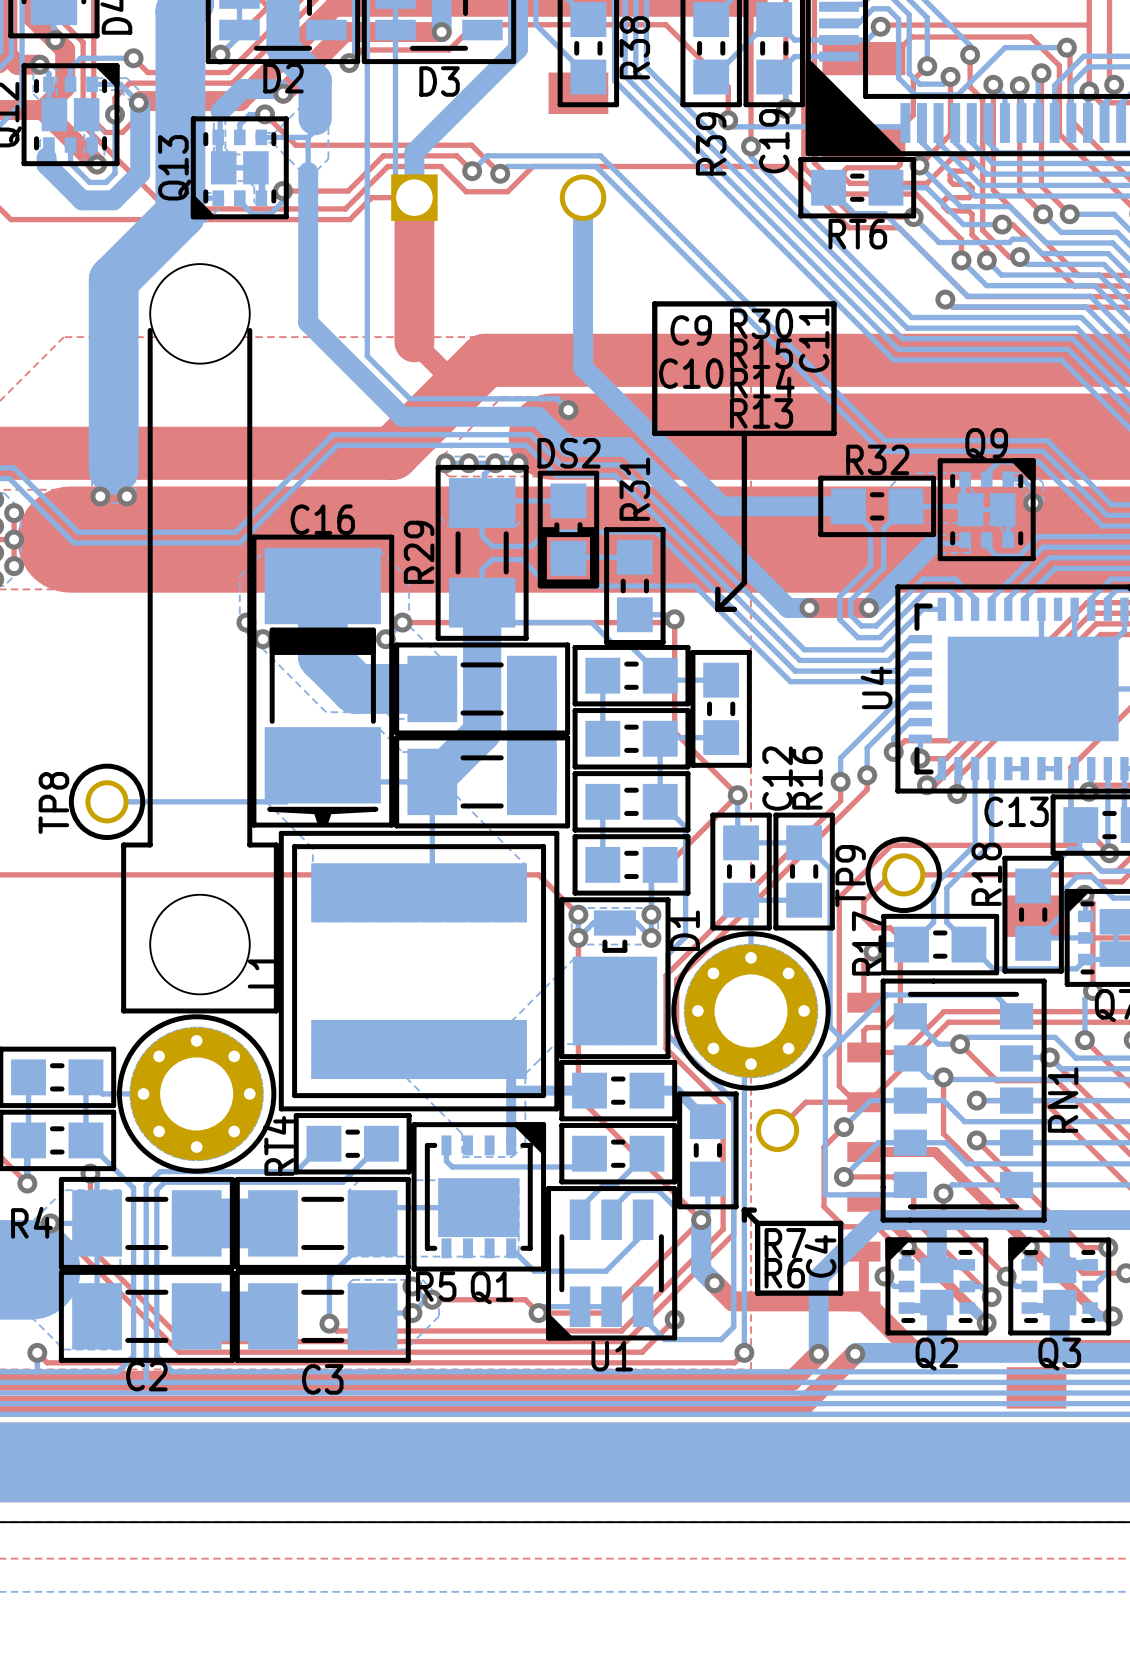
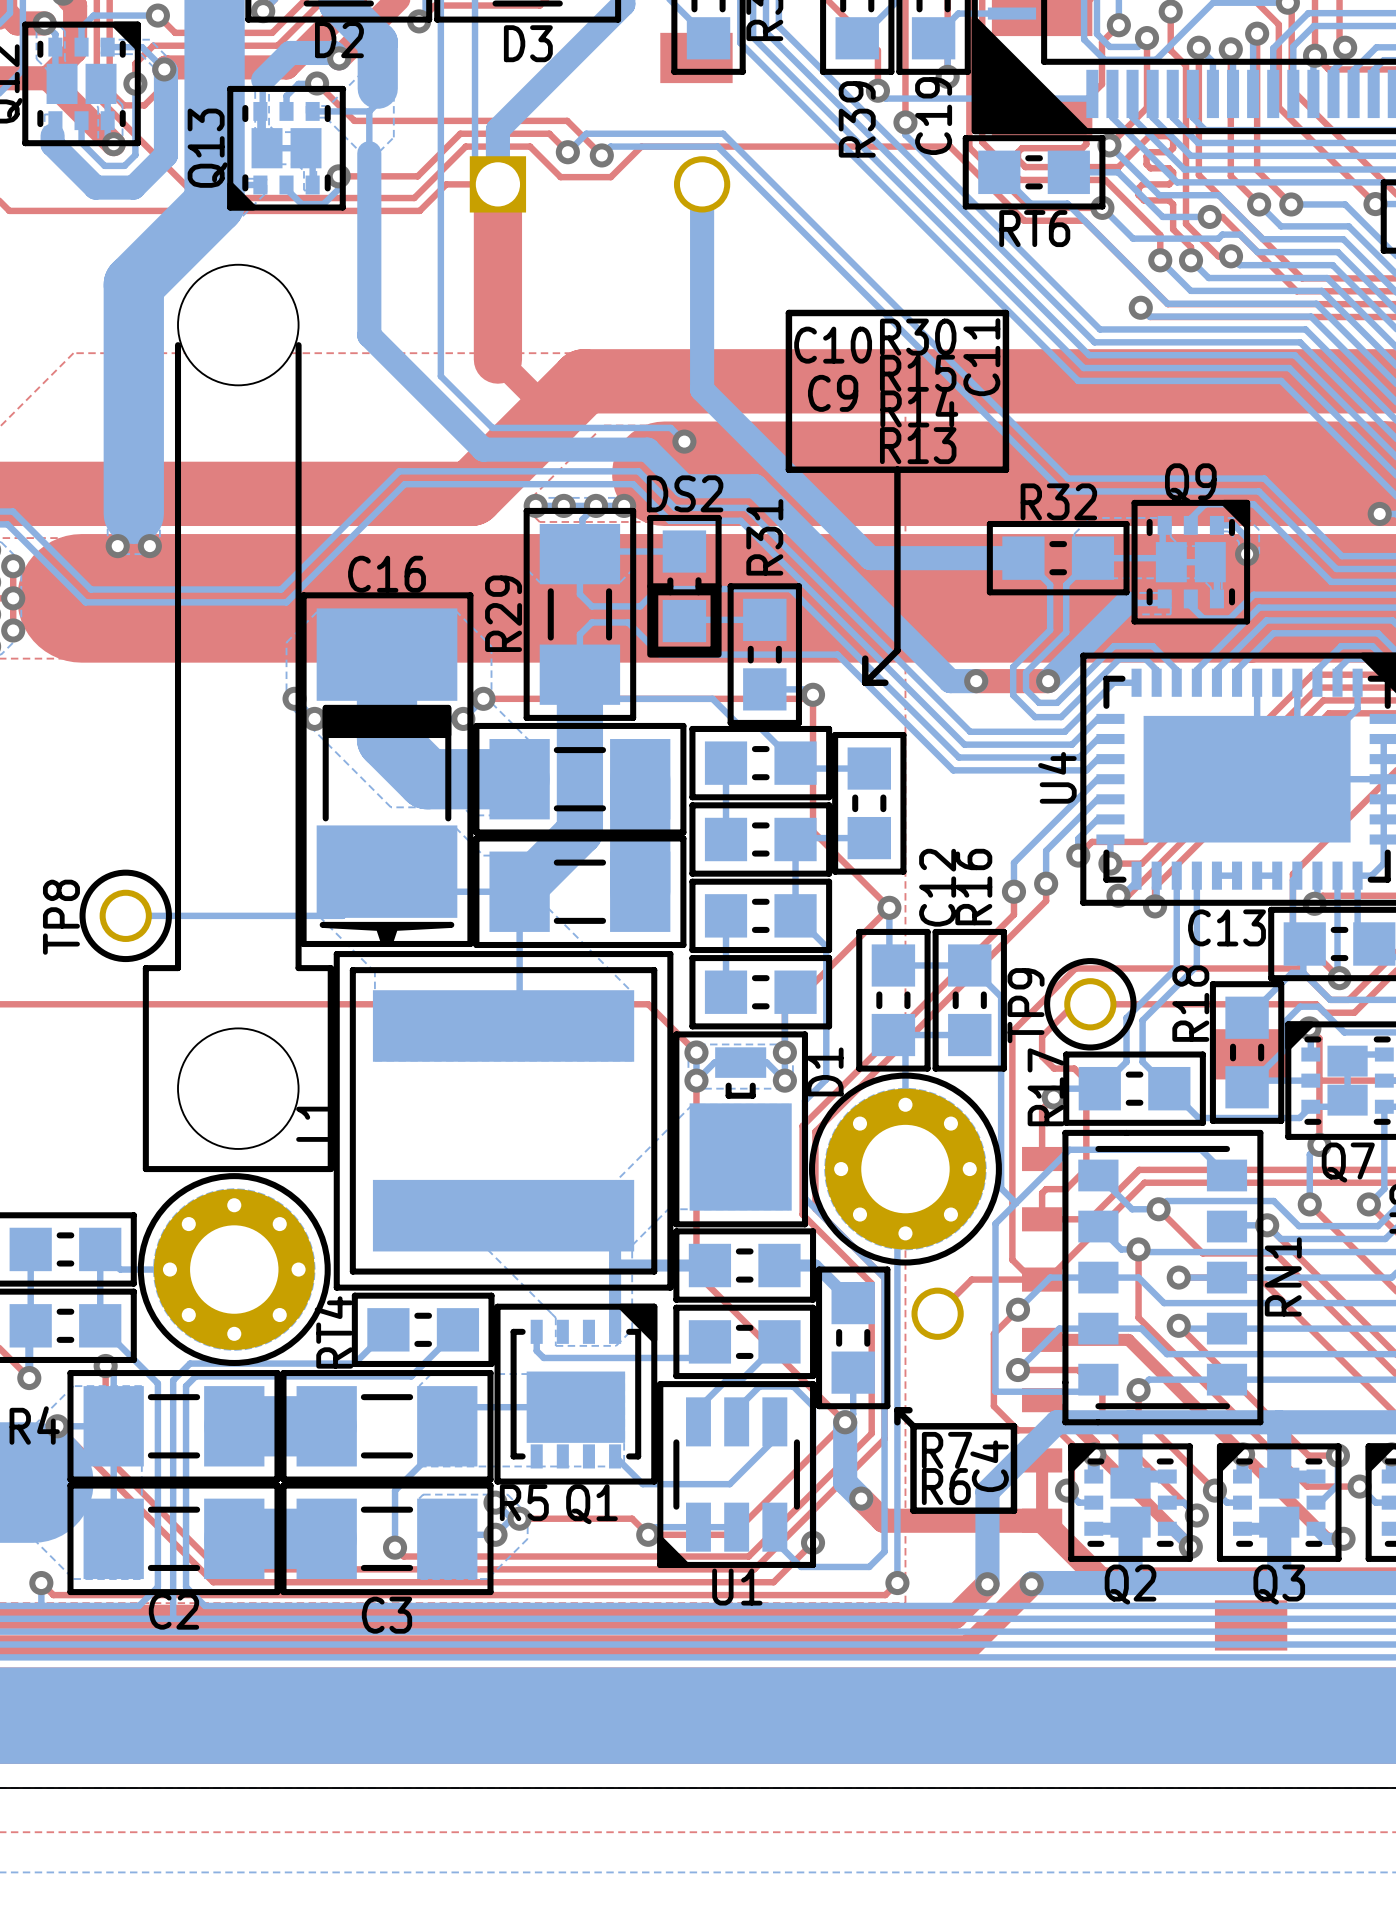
C9 name position: C9 (691, 330) -> C9 (833, 393)
C10 name position: C10 (691, 373) -> C10 (833, 345)

